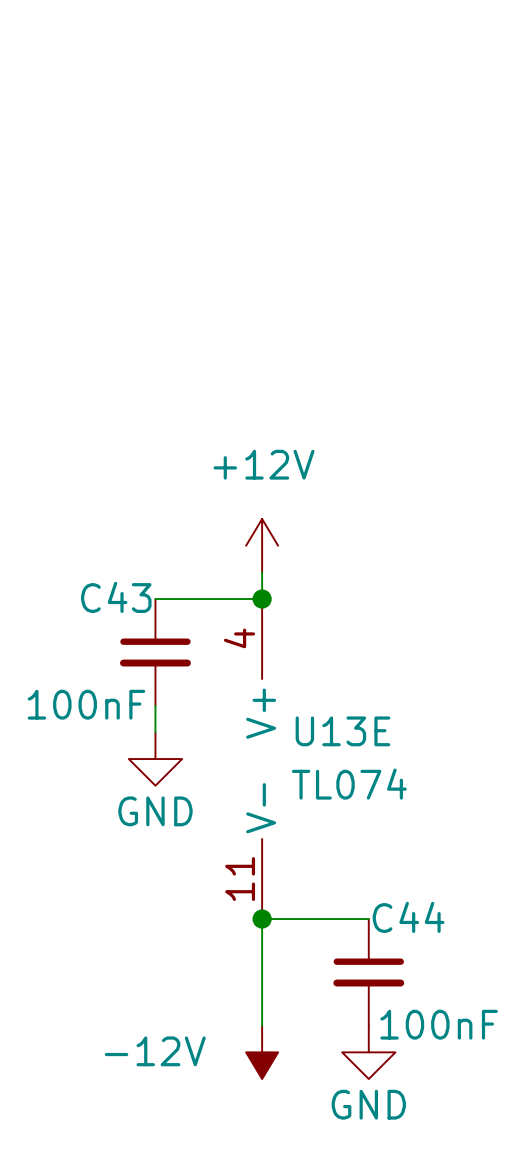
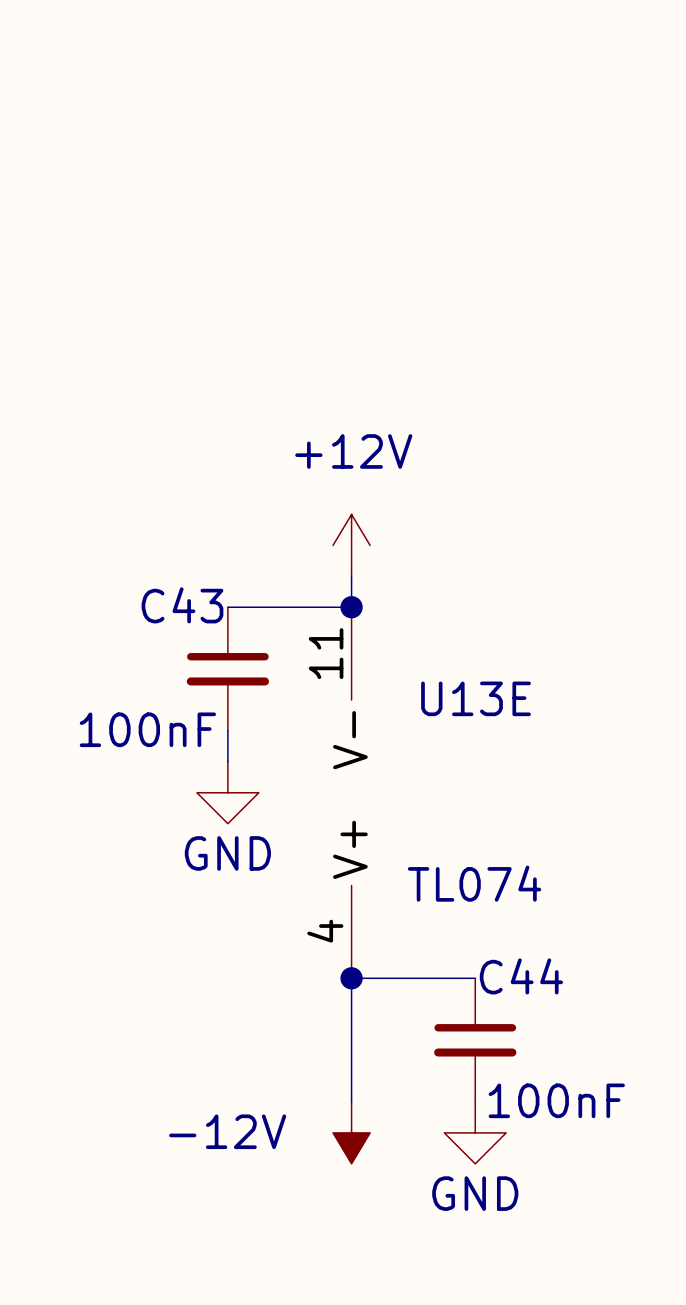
U13E name position: U13E (342, 731) -> U13E (475, 698)
U13E rotation: 0° (262, 759) -> 180° (351, 792)
U13E value position: TL074 (349, 784) -> TL074 (474, 883)

